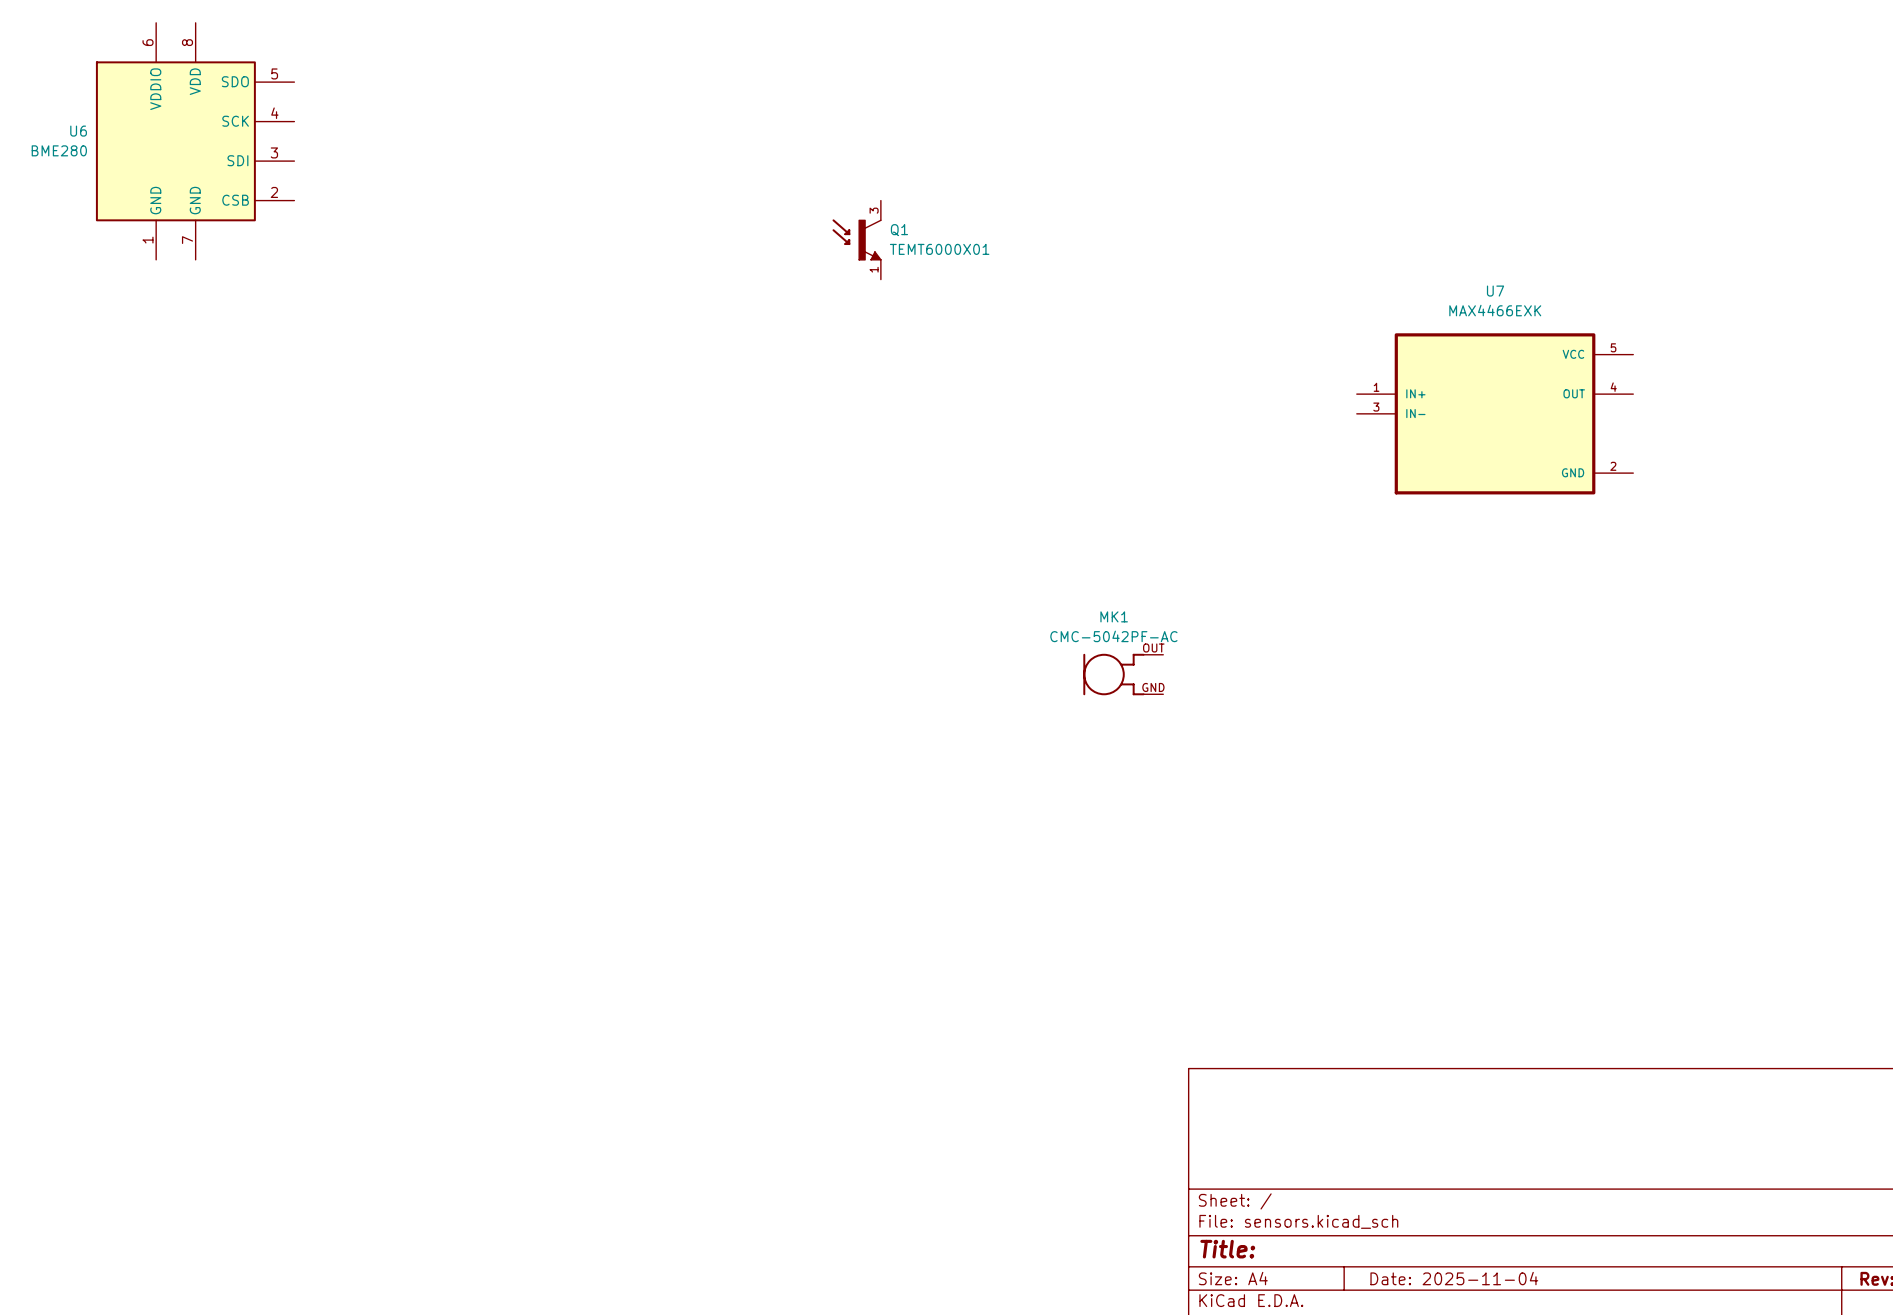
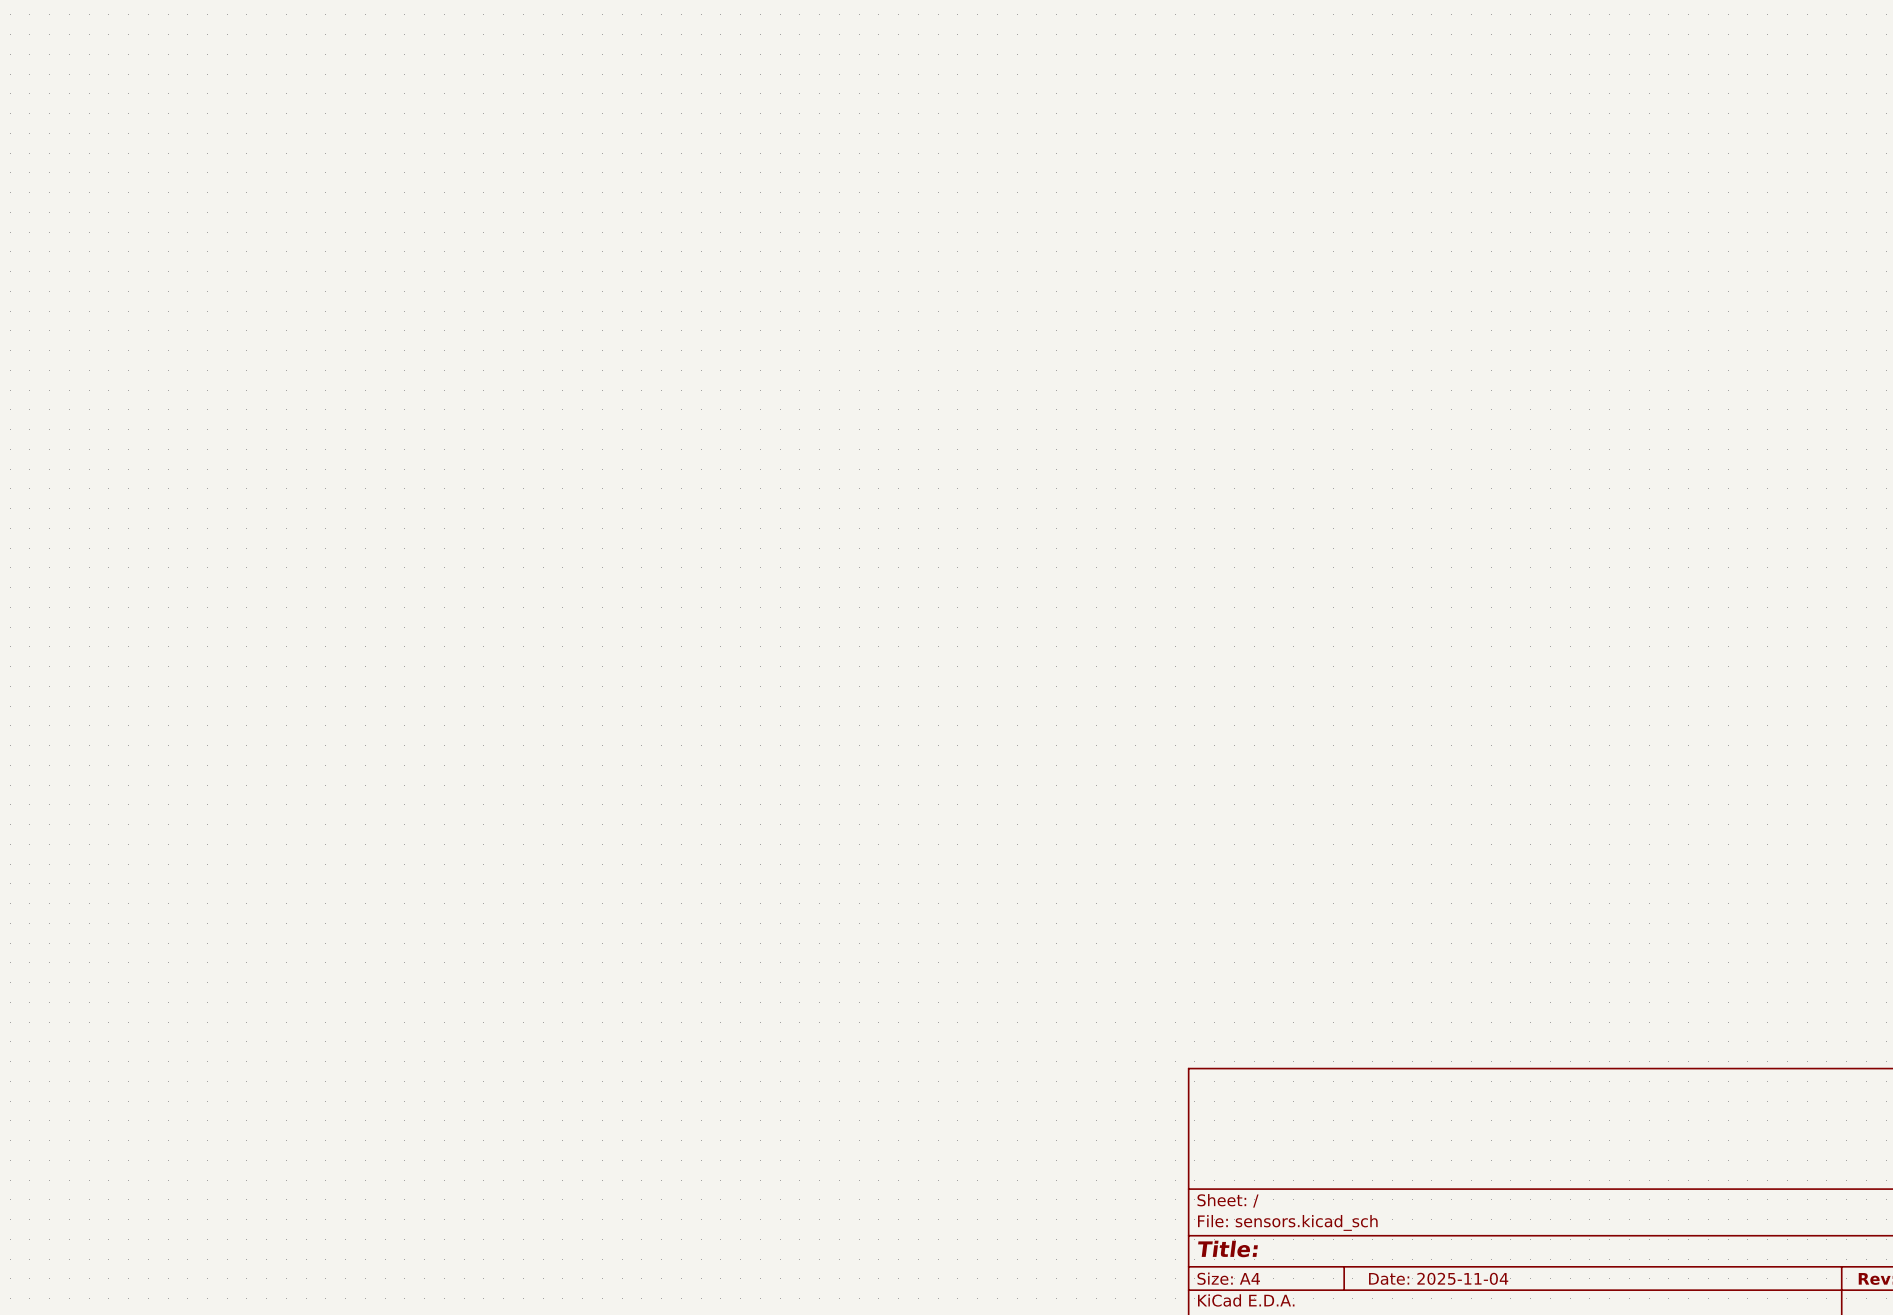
U6: BME280 (195, 141) -> none
Q1: TEMT6000X01 (856, 240) -> none
U7: MAX4466EXK (1495, 413) -> none
MK1: CMC-5042PF-AC (1123, 674) -> none

